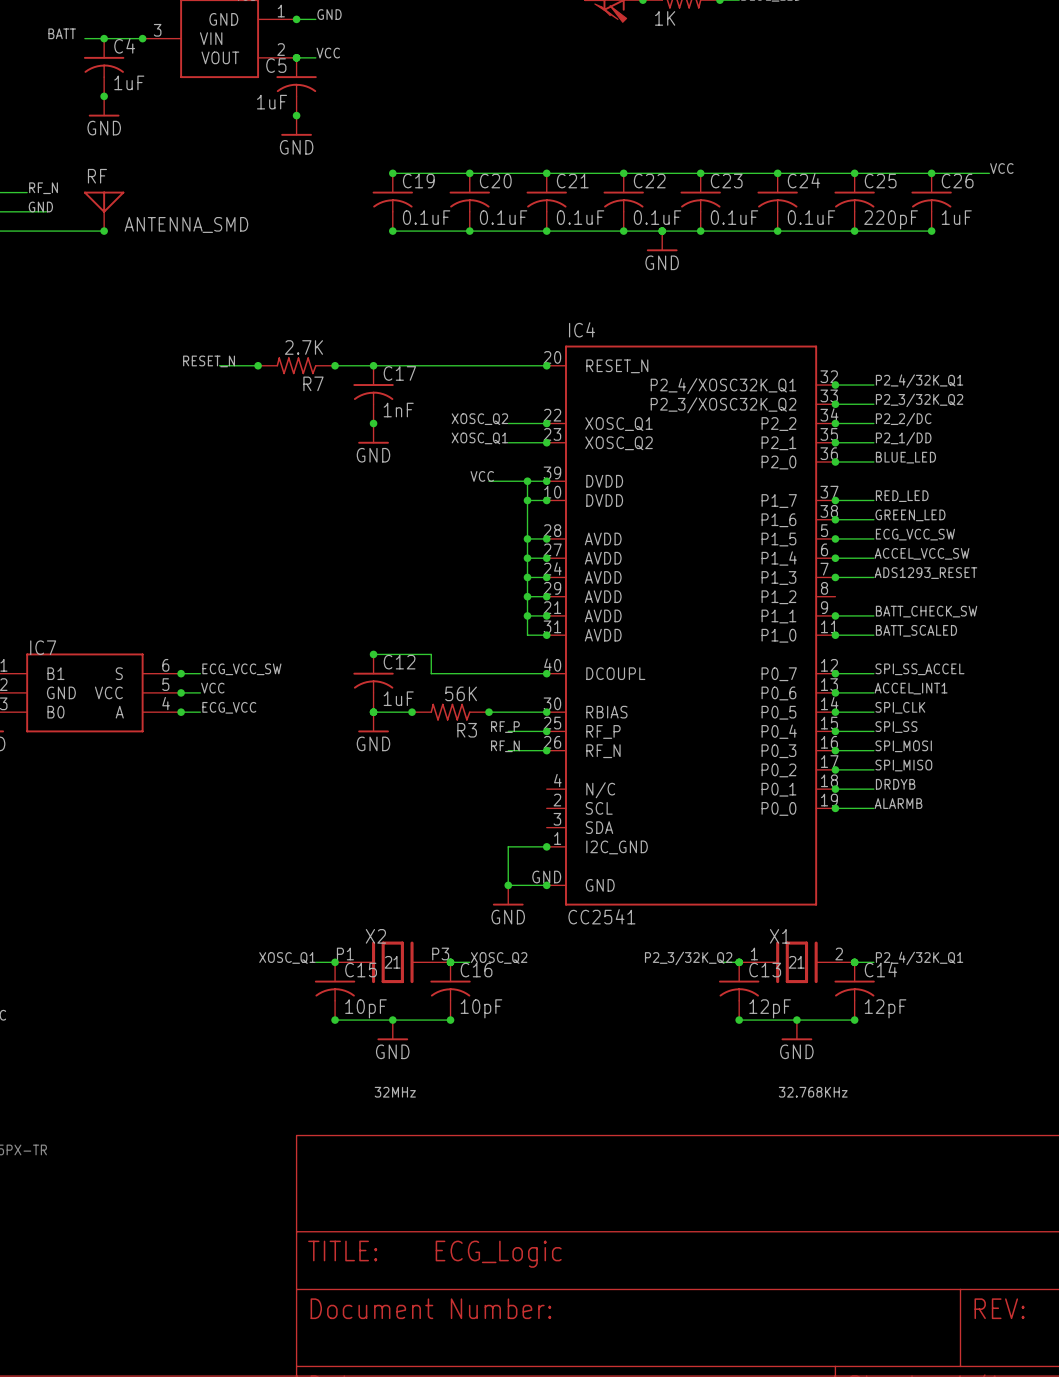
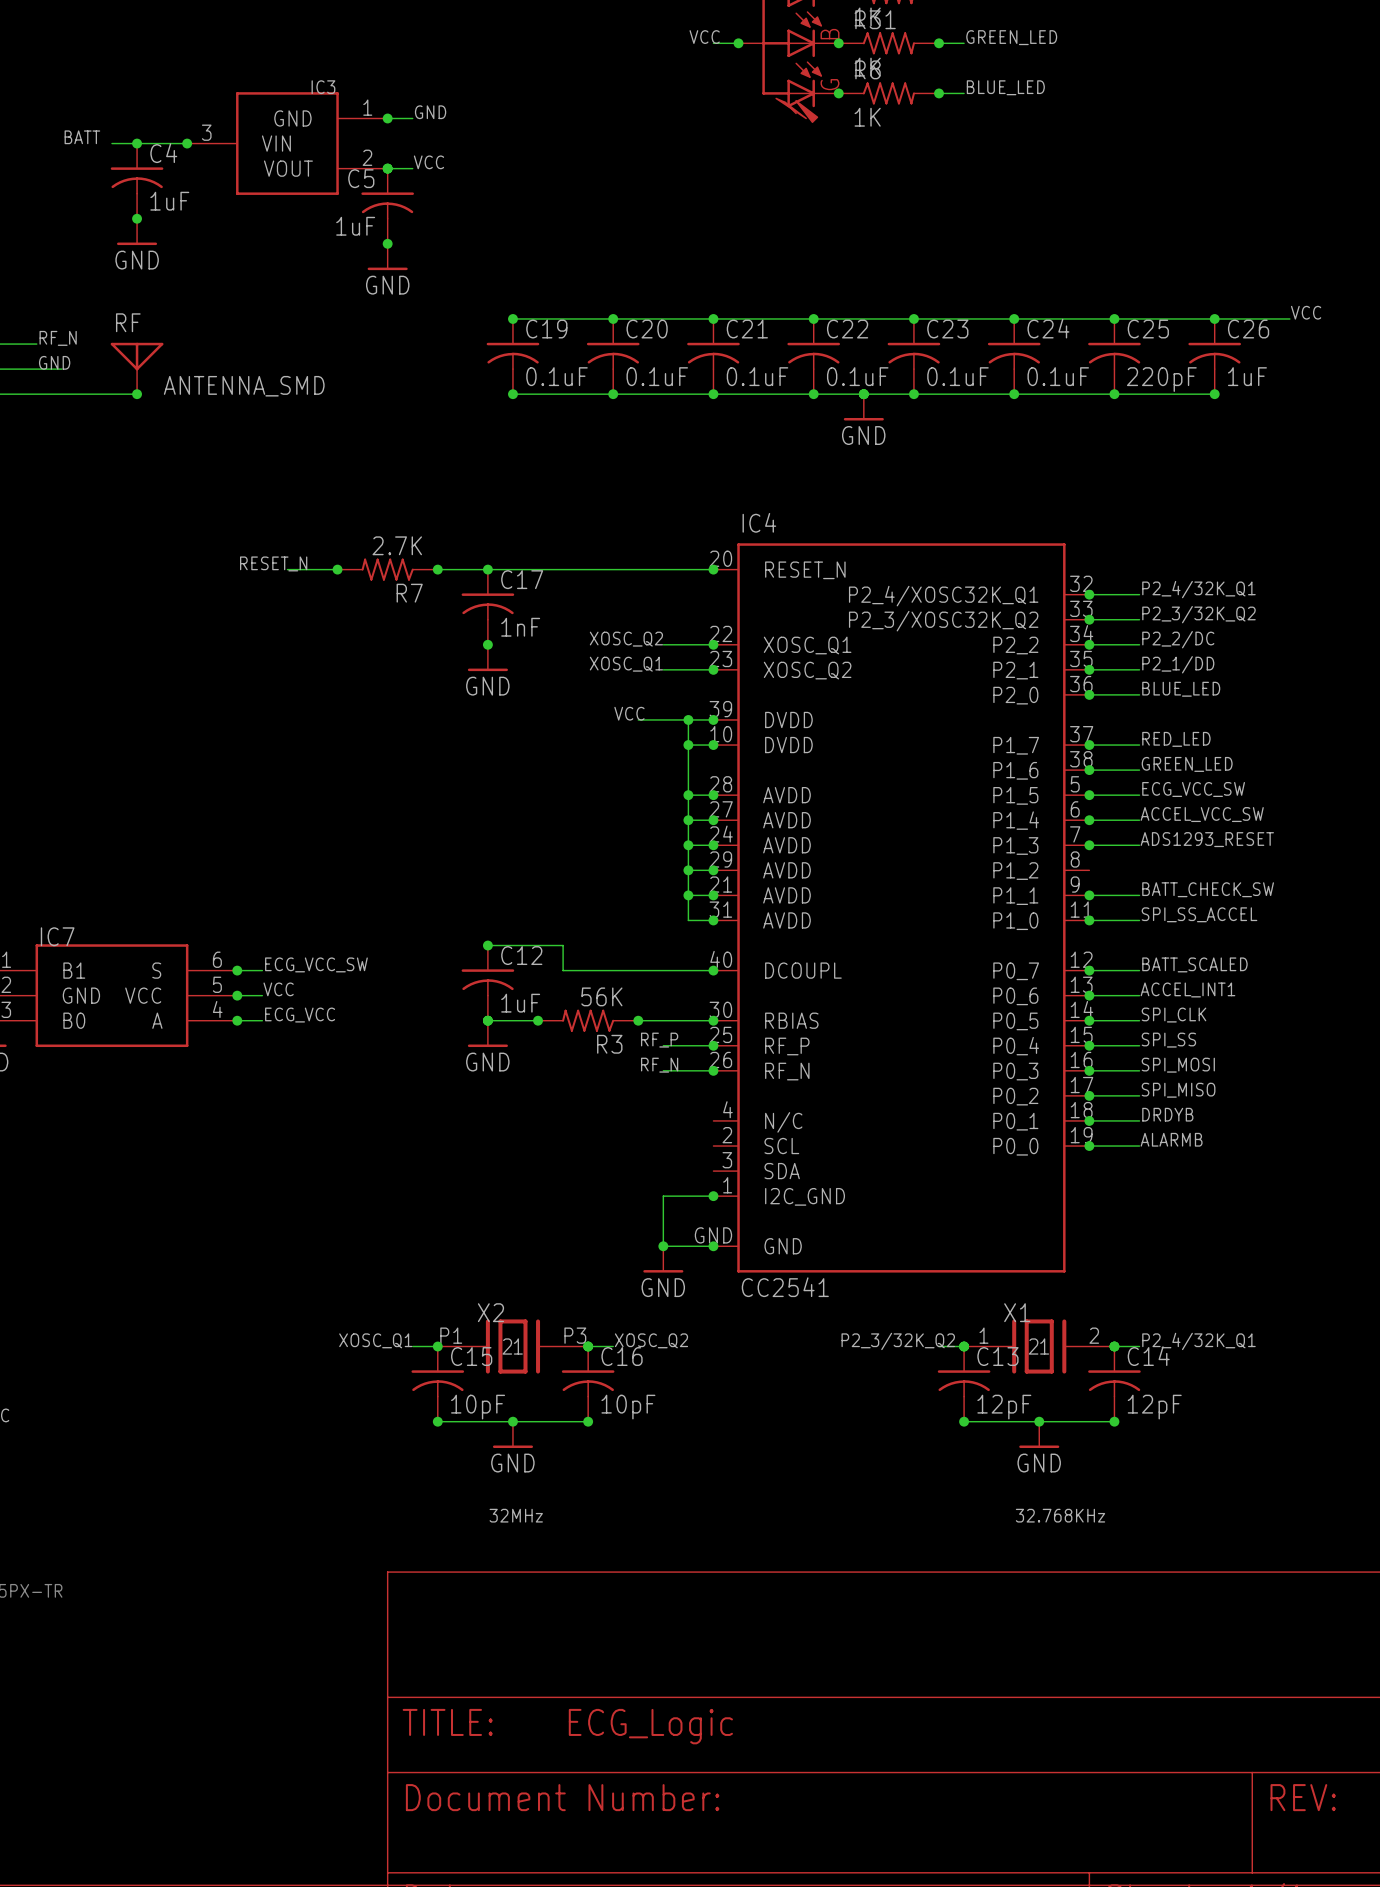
label: BATT_SCALED (916, 630) -> SPI_SS_ACCEL (1199, 914)
label: SPI_SS_ACCEL (919, 669) -> BATT_SCALED (1194, 964)

